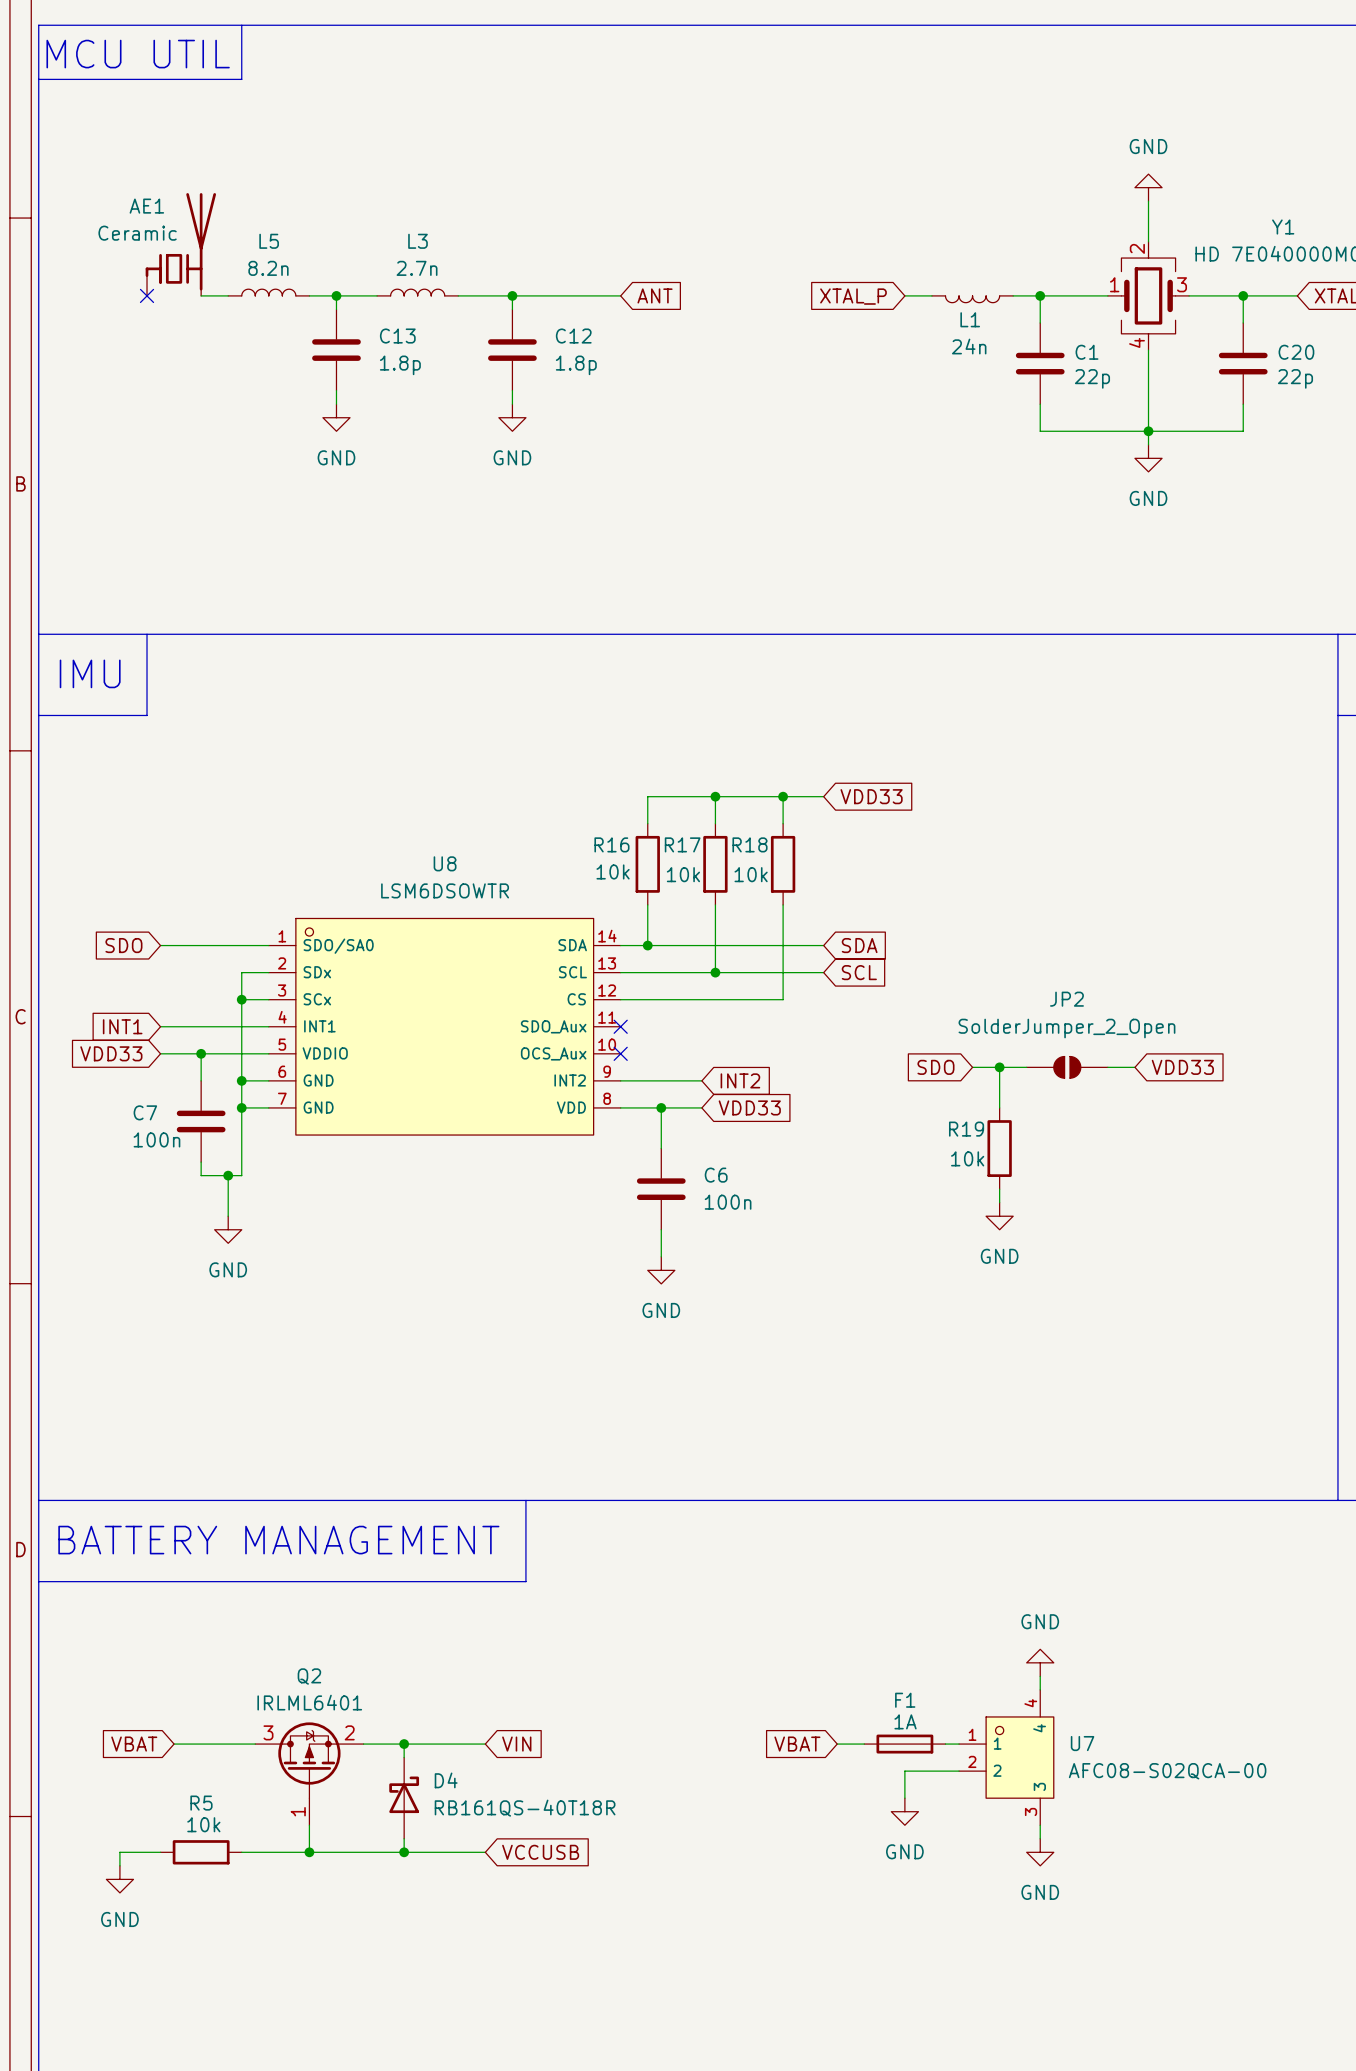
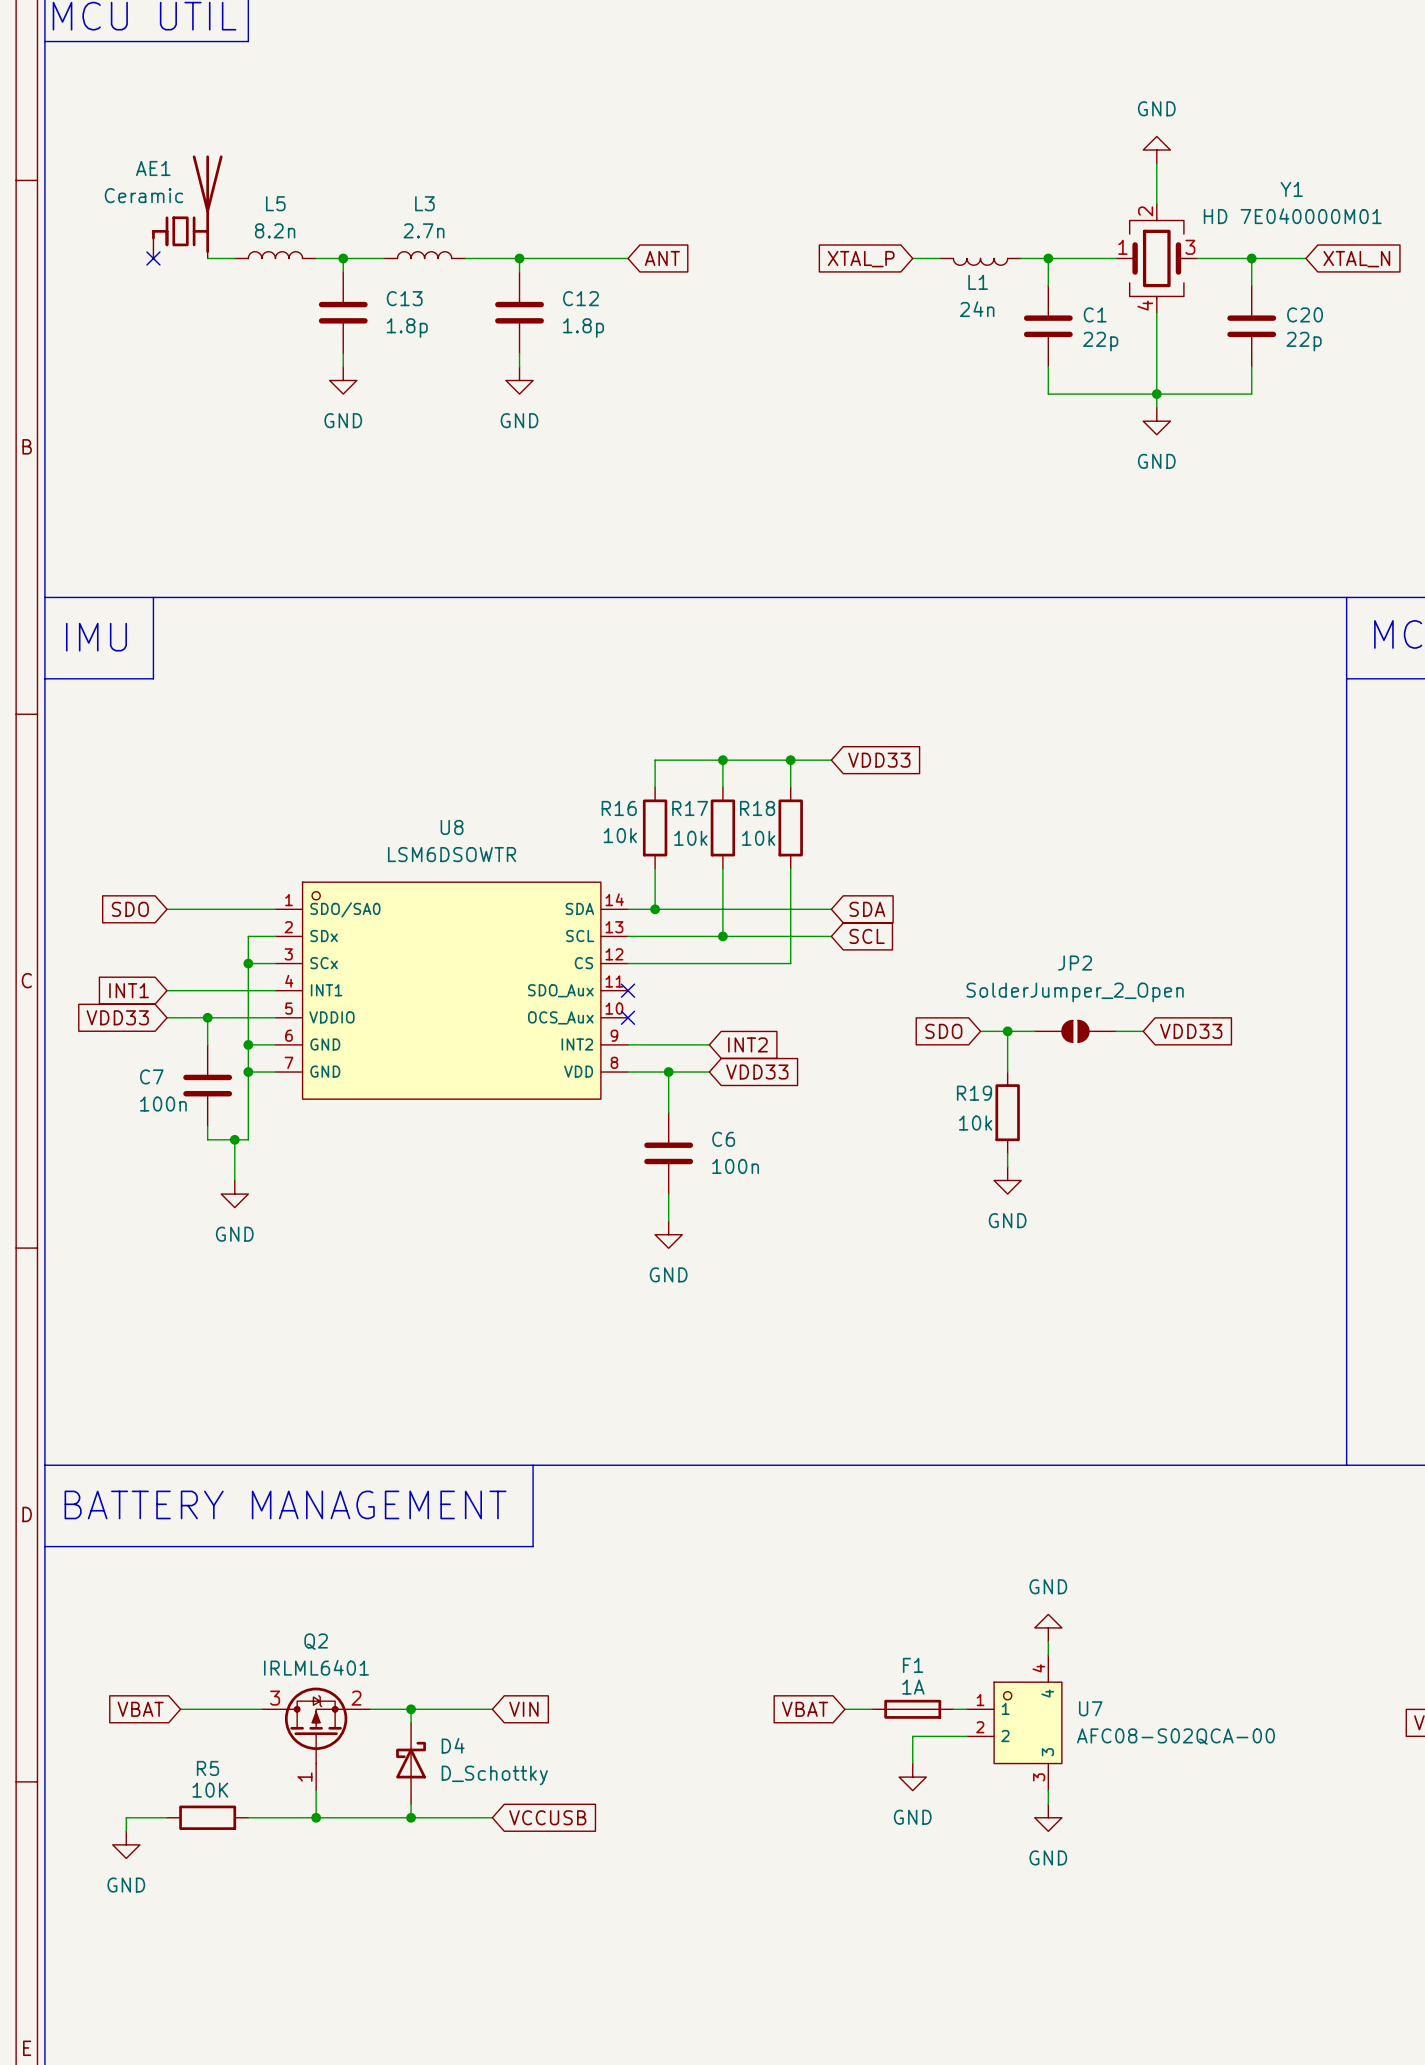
D4 value: RB161QS-40T18R (525, 1808) -> D_Schottky (494, 1775)
R5 value: 10k (203, 1824) -> 10K (210, 1790)

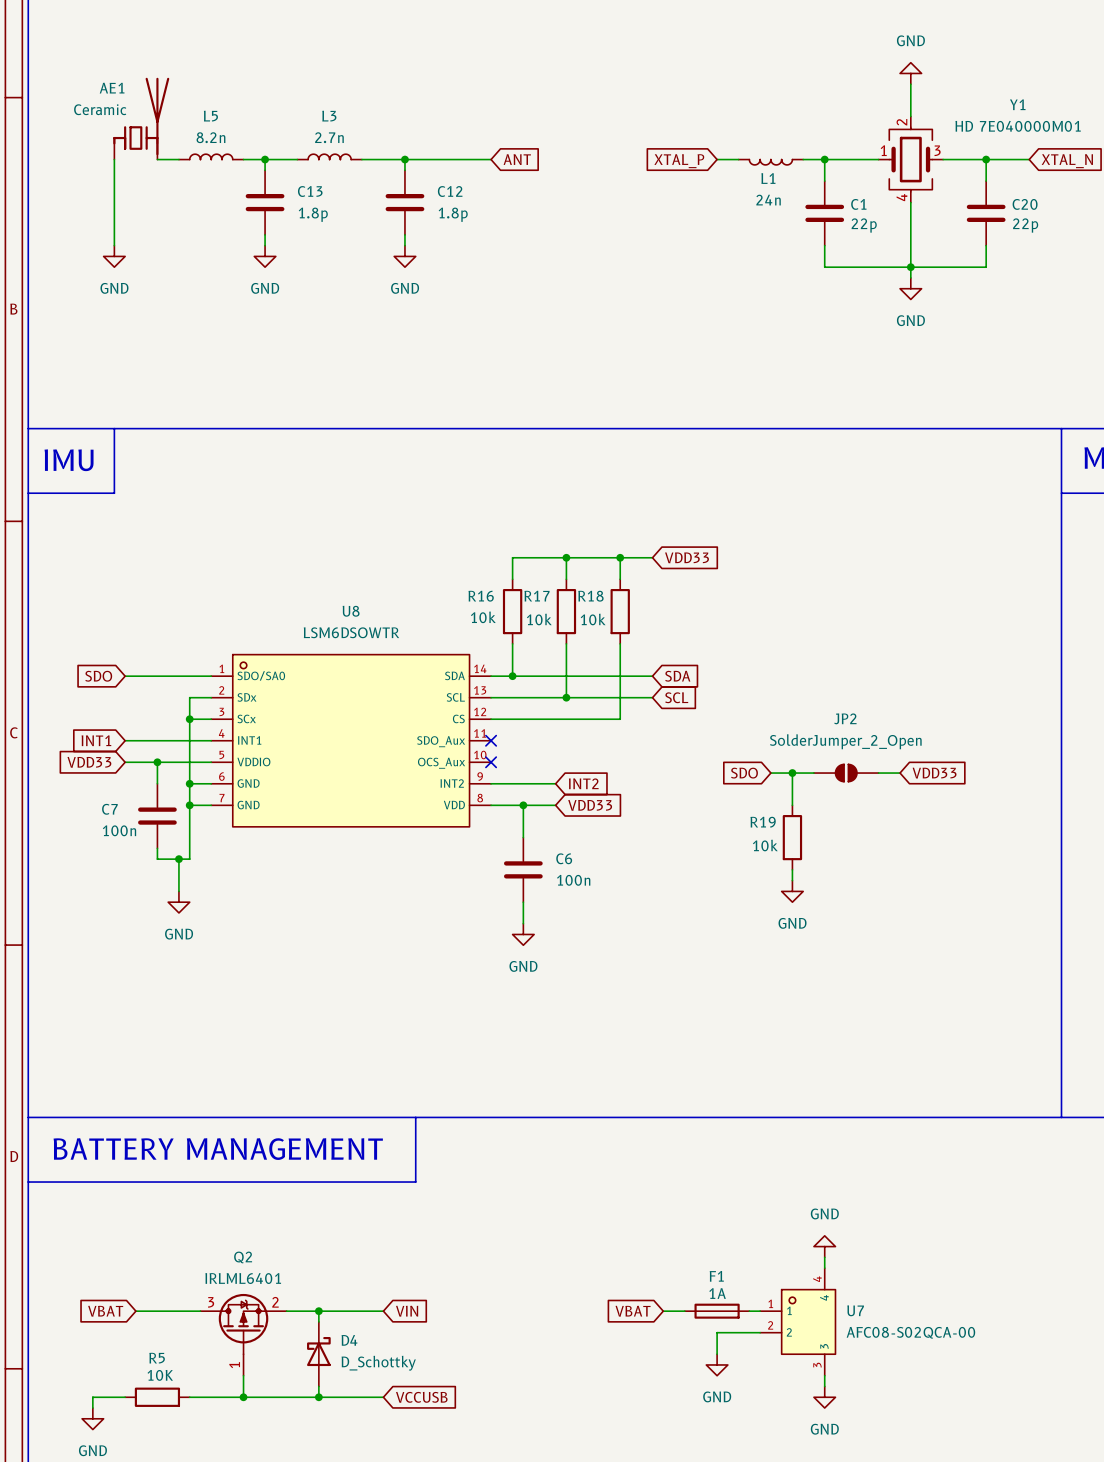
wire: none -> (114, 159) (114, 245)
no-connect mark: (153, 258) -> none
power symbol: none -> GND (114, 256)

